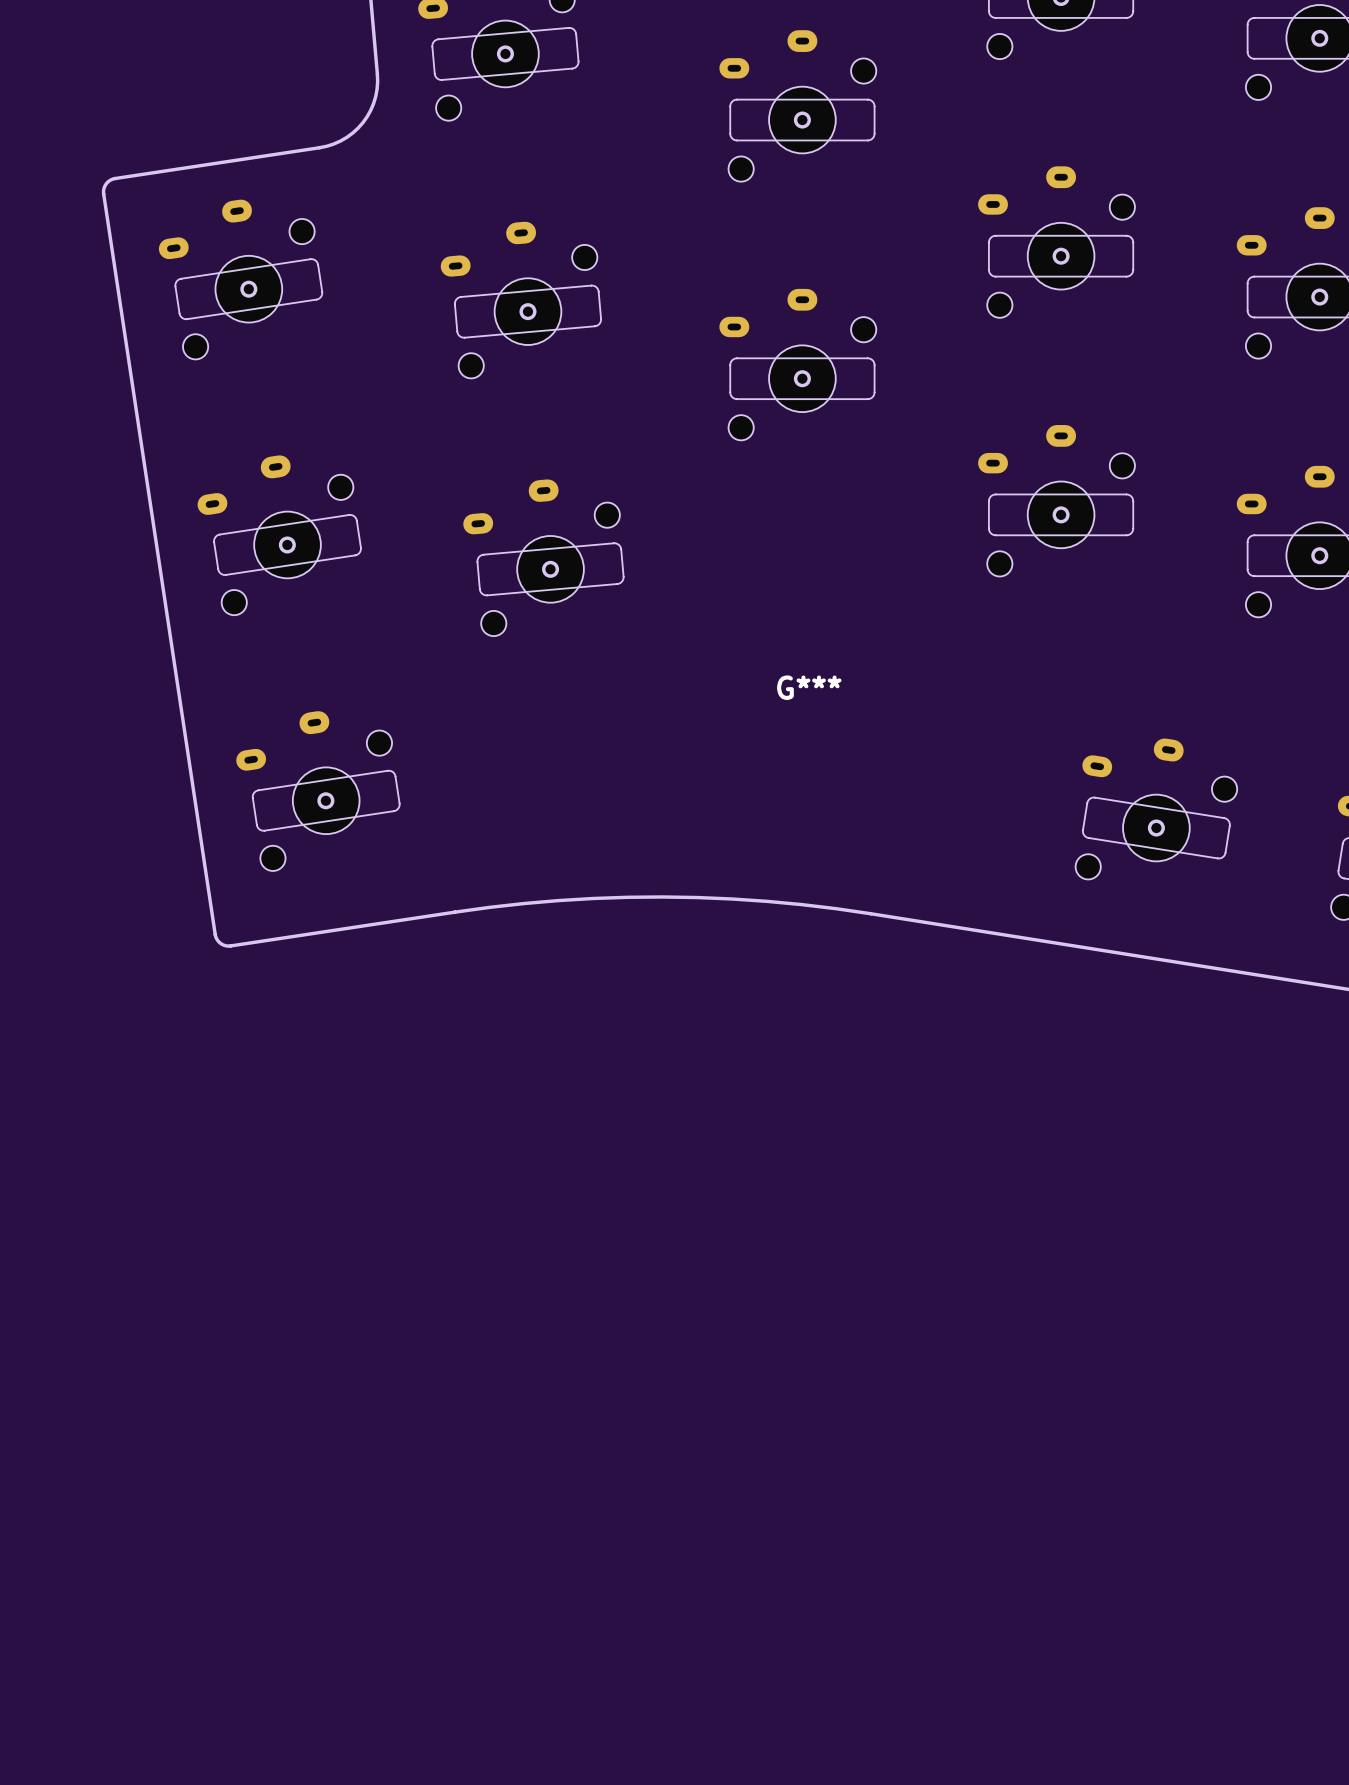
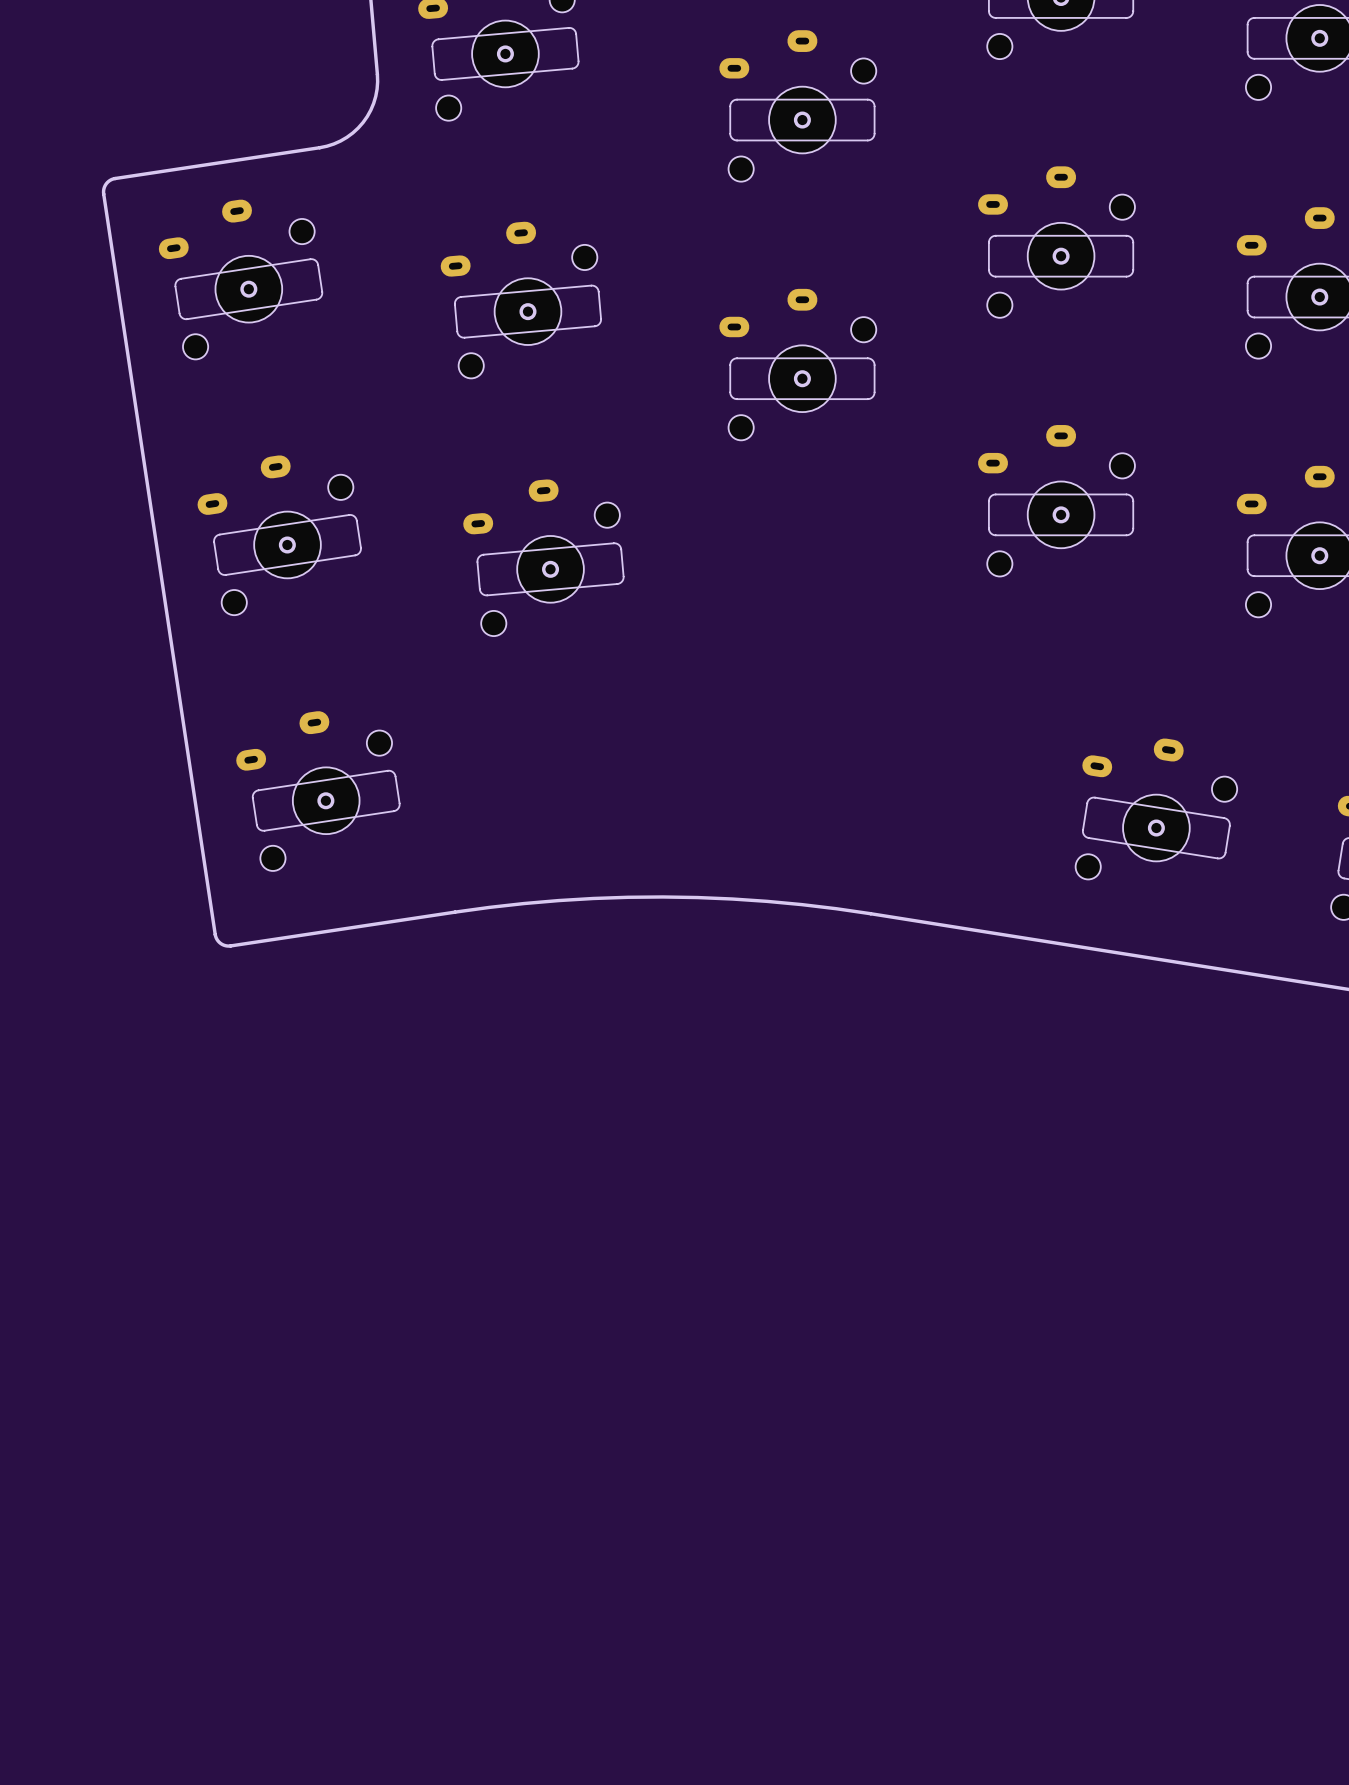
G***: (809, 687) -> none

